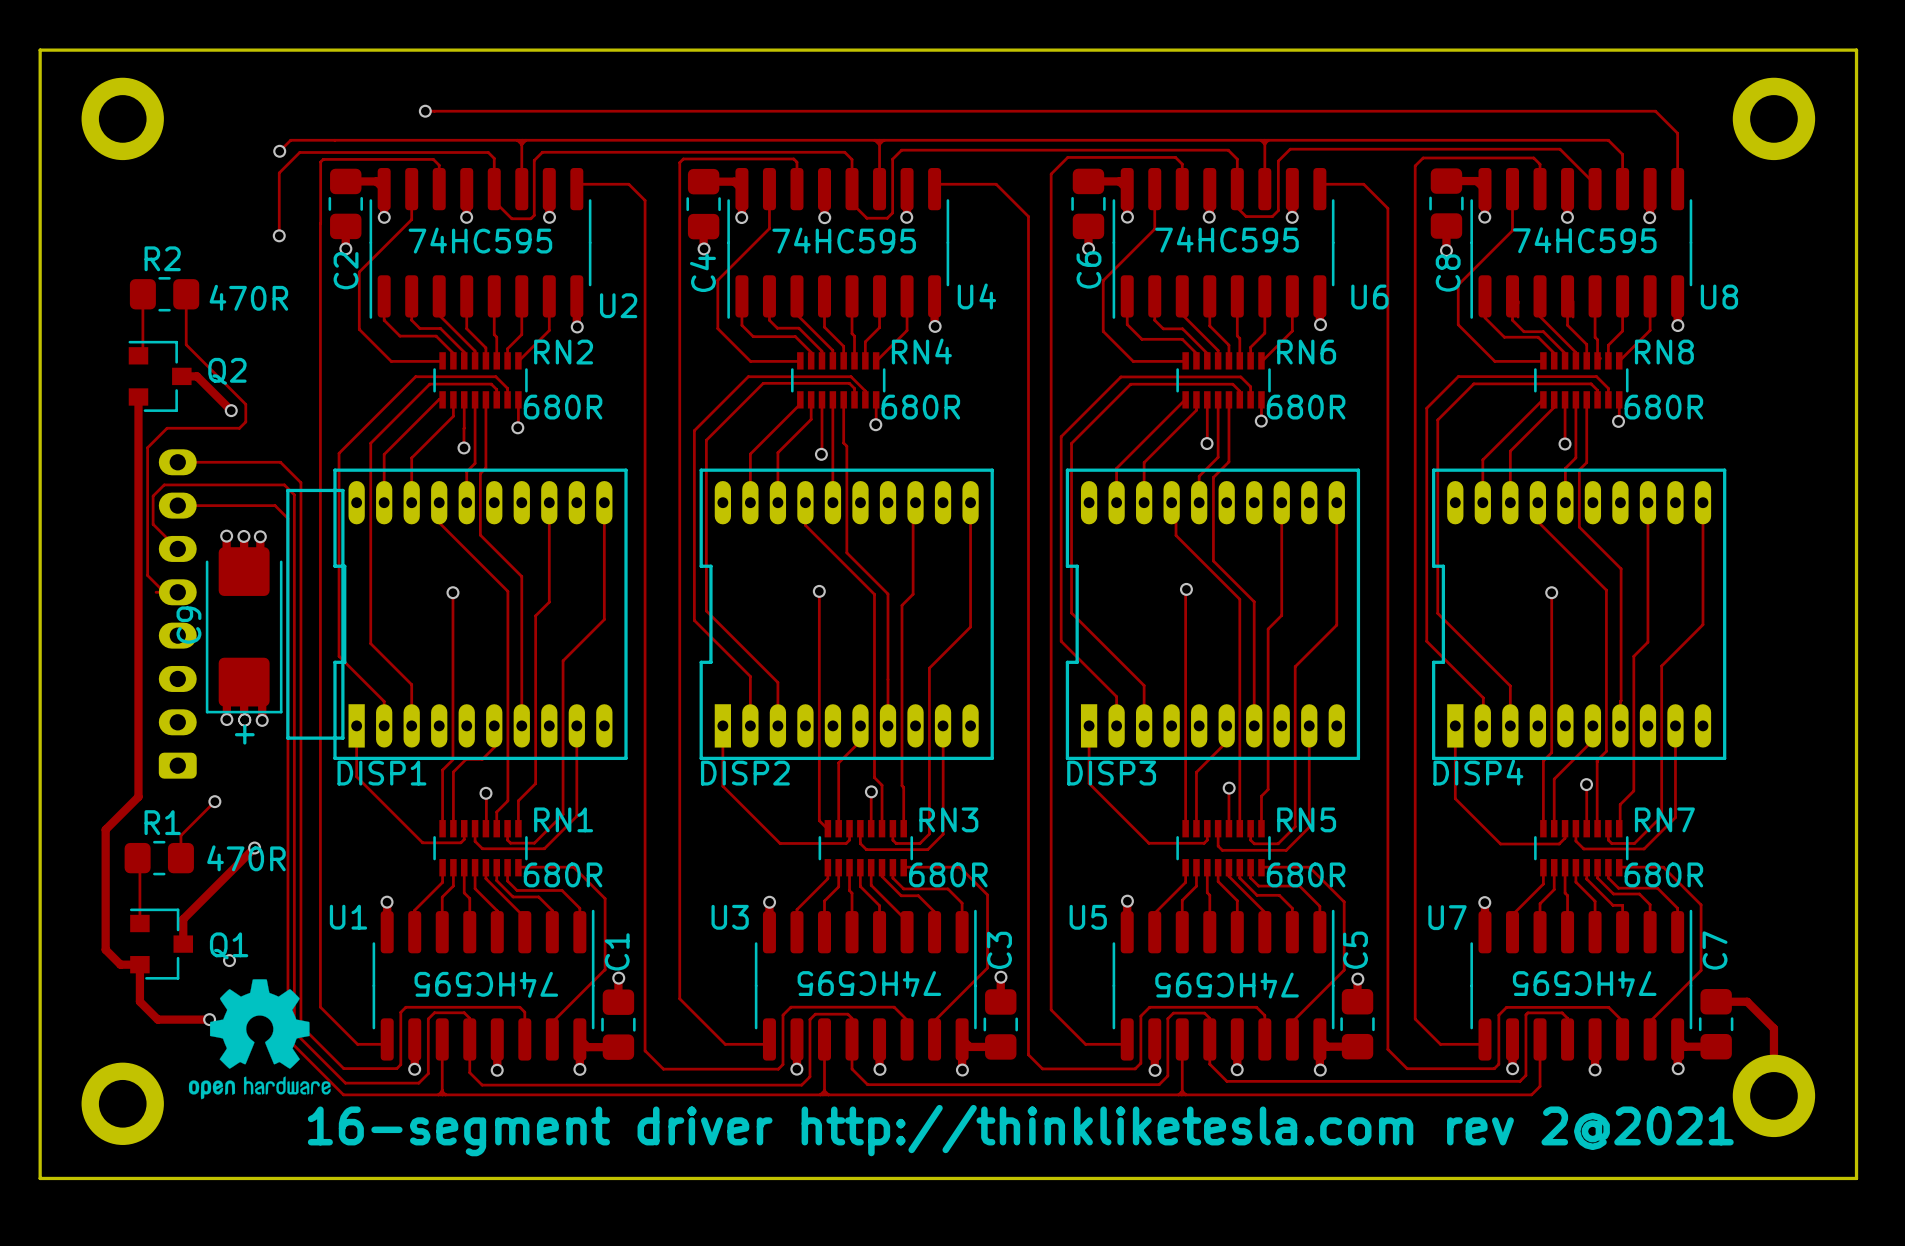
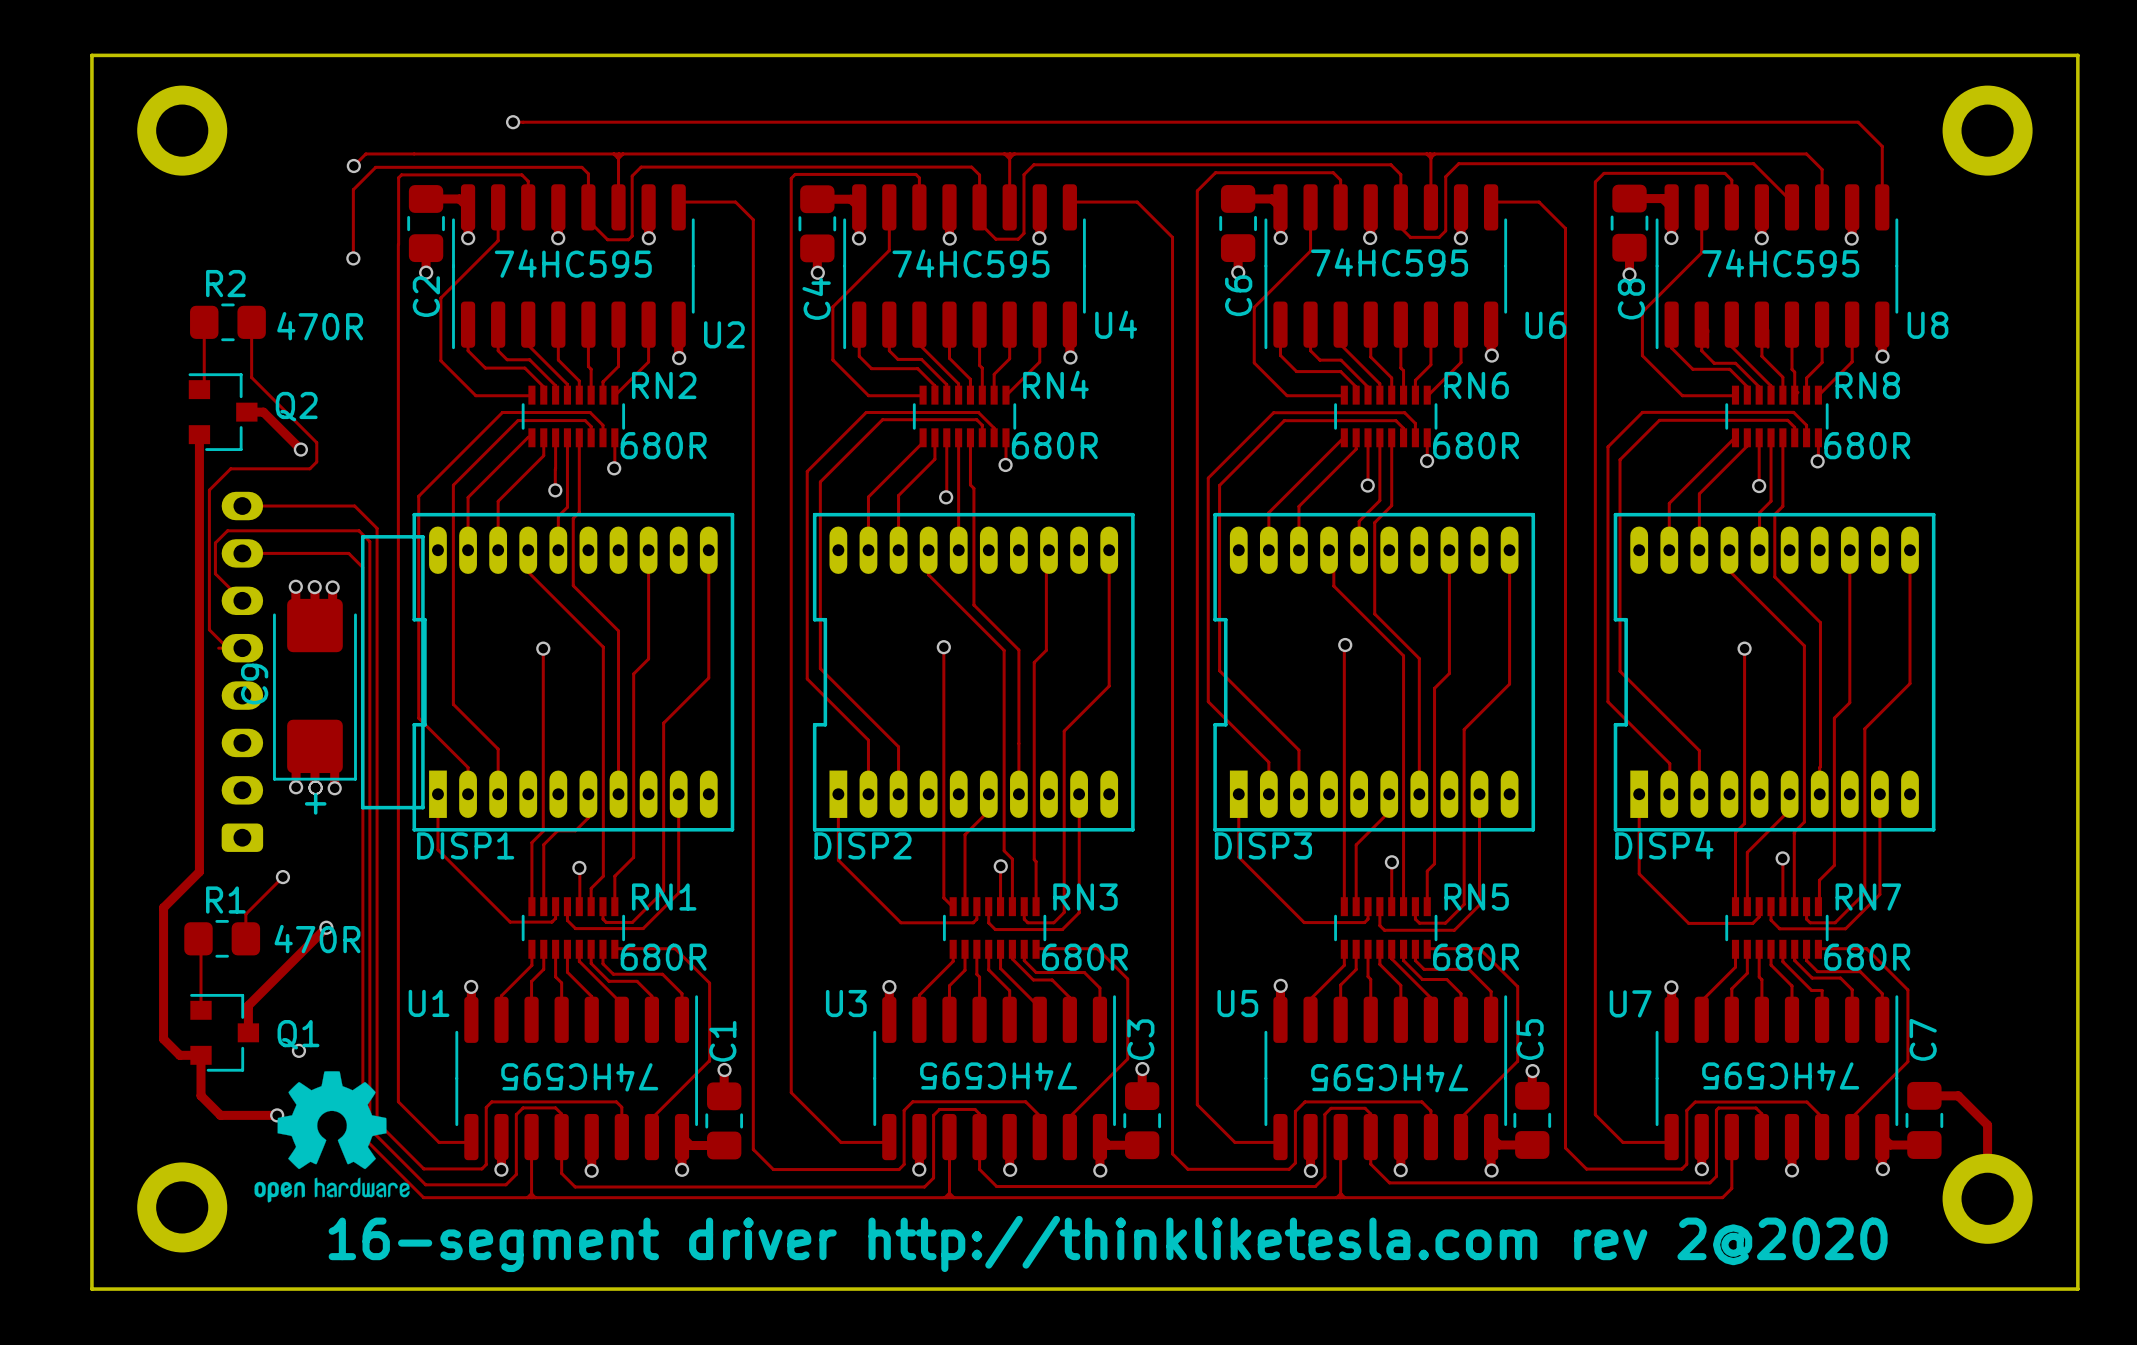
text: 16-segment driver http://thinkliketesla.com rev 2@2021 (1020, 1130) -> 16-segment driver http://thinkliketesla.com rev 2@2020 (1108, 1243)

